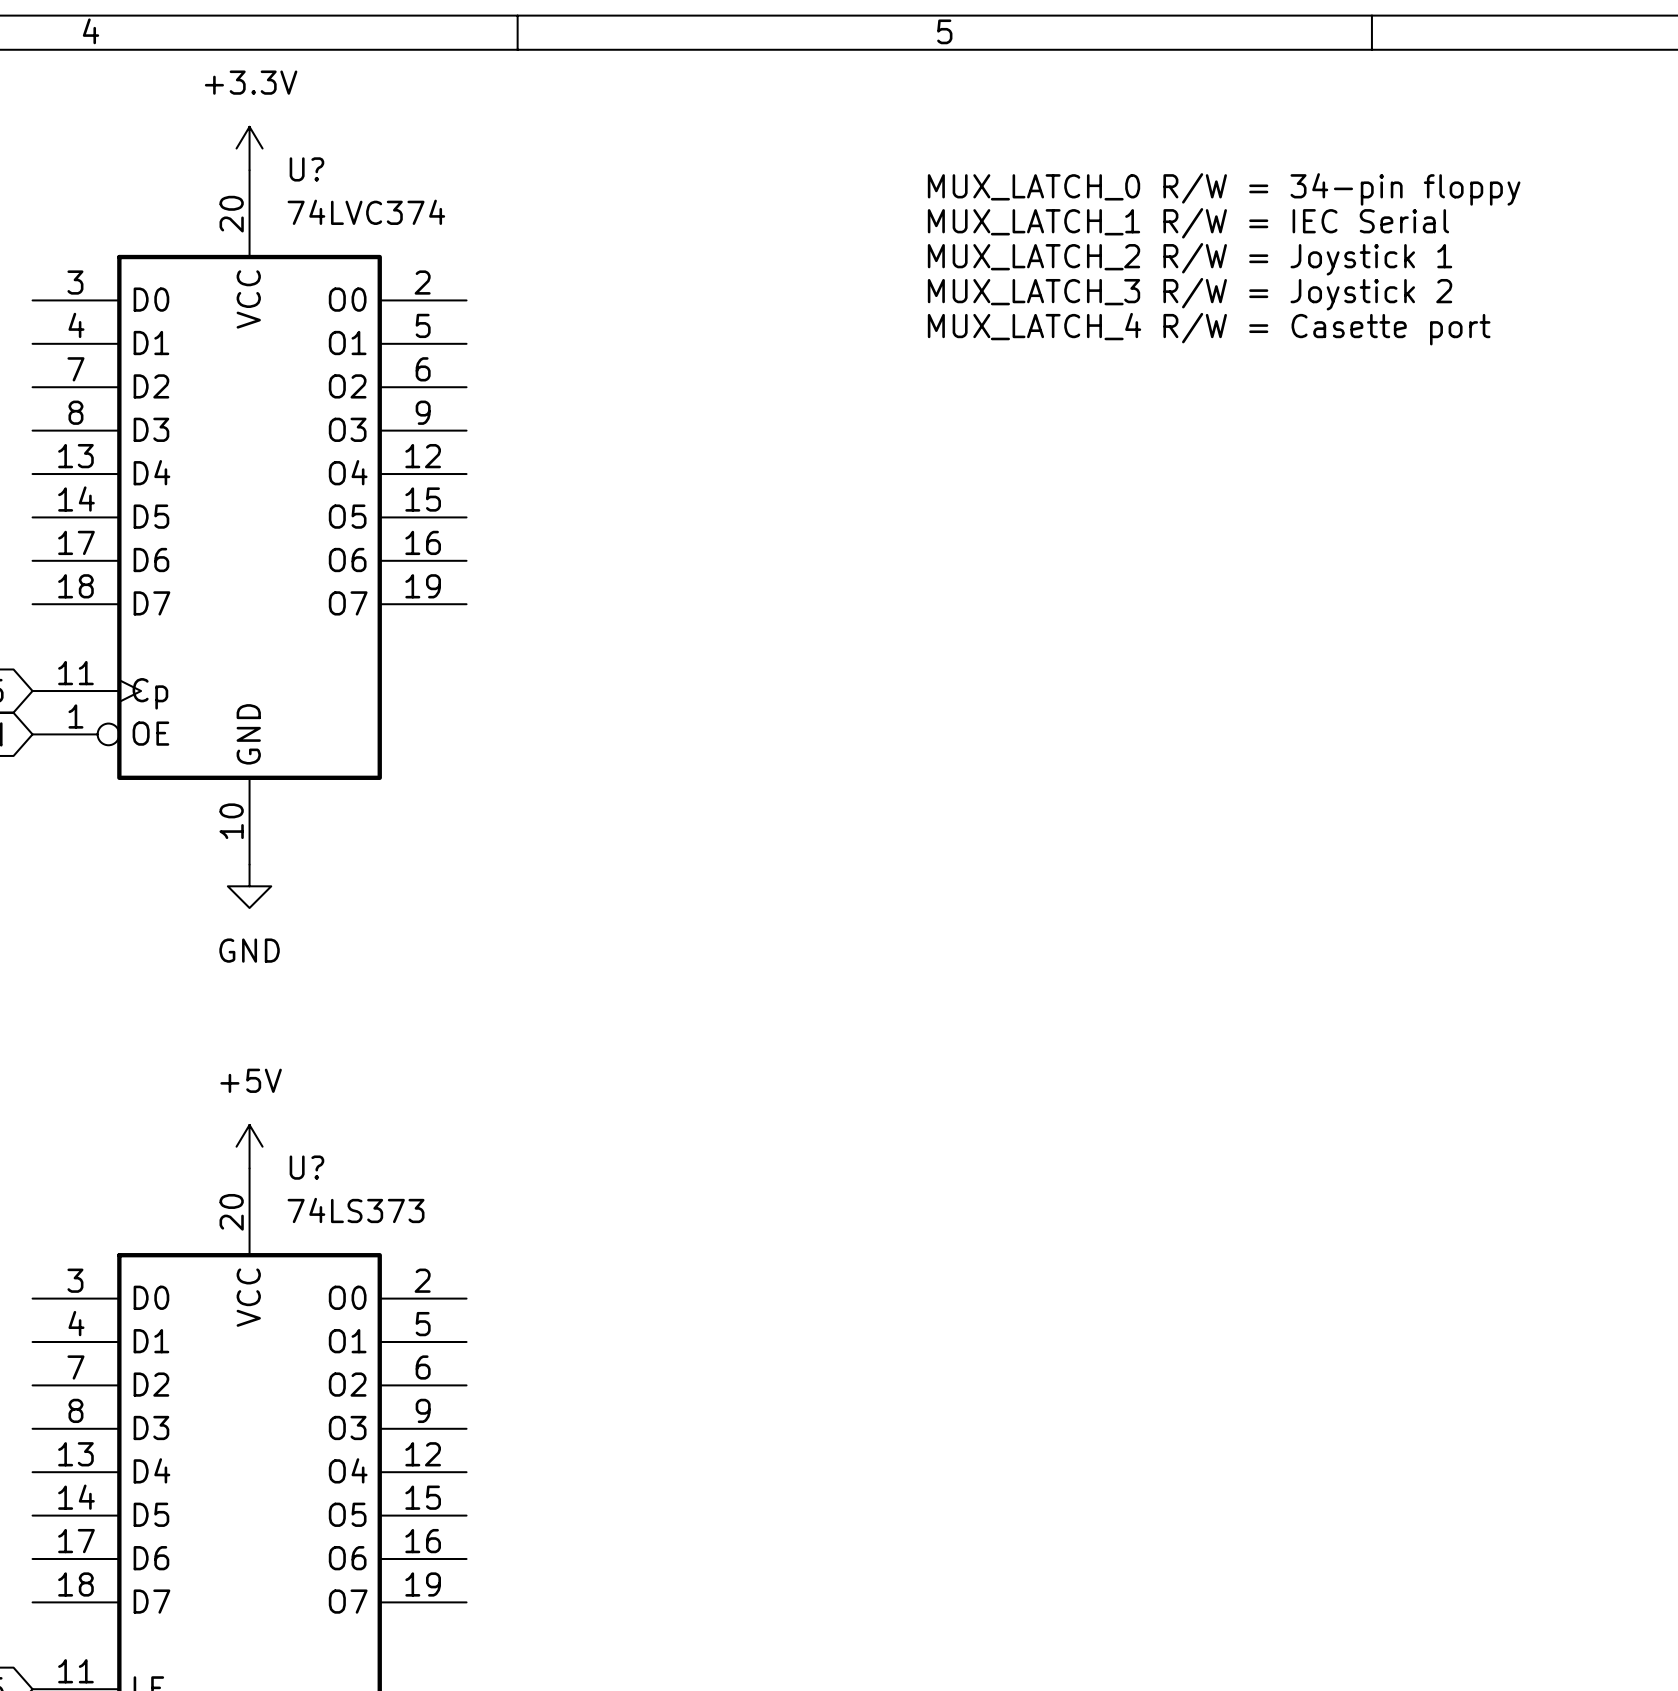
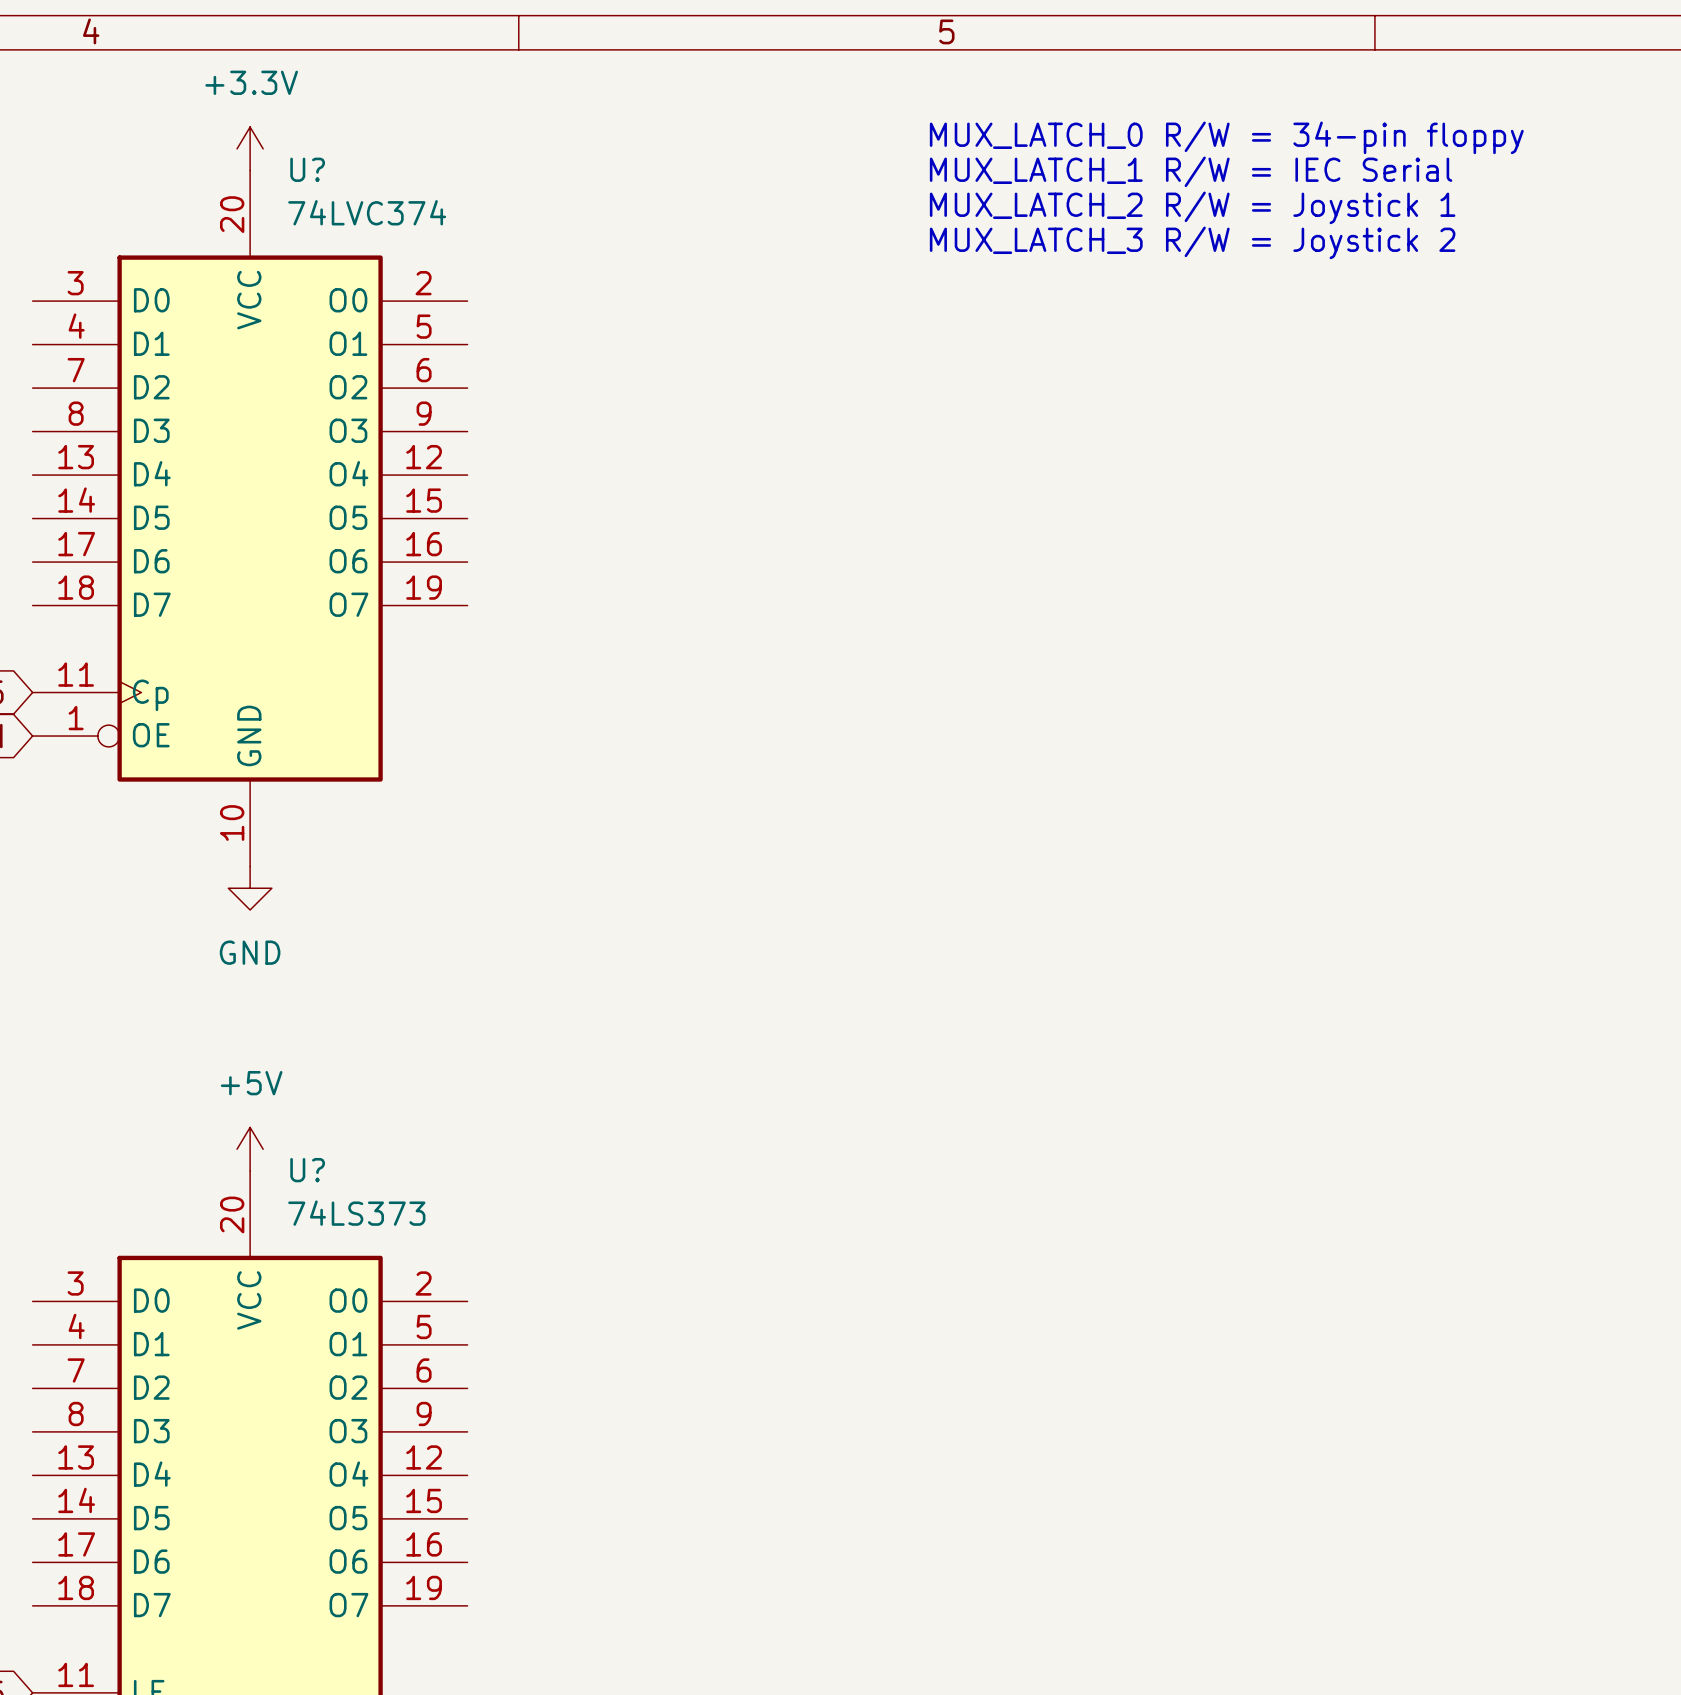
text position: MUX_LATCH_0 R/W = 34-pin floppy (1224, 189) -> MUX_LATCH_0 R/W = 34-pin floppy (1226, 137)
text position: MUX_LATCH_1 R/W = IEC Serial (1188, 223) -> MUX_LATCH_1 R/W = IEC Serial (1191, 171)
text position: MUX_LATCH_2 R/W = Joystick 1 (1190, 259) -> MUX_LATCH_2 R/W = Joystick 1 (1192, 207)
text position: MUX_LATCH_3 R/W = Joystick 2 (1190, 294) -> MUX_LATCH_3 R/W = Joystick 2 (1192, 242)
text: MUX_LATCH_4 R/W = Casette port (1209, 329) -> none

